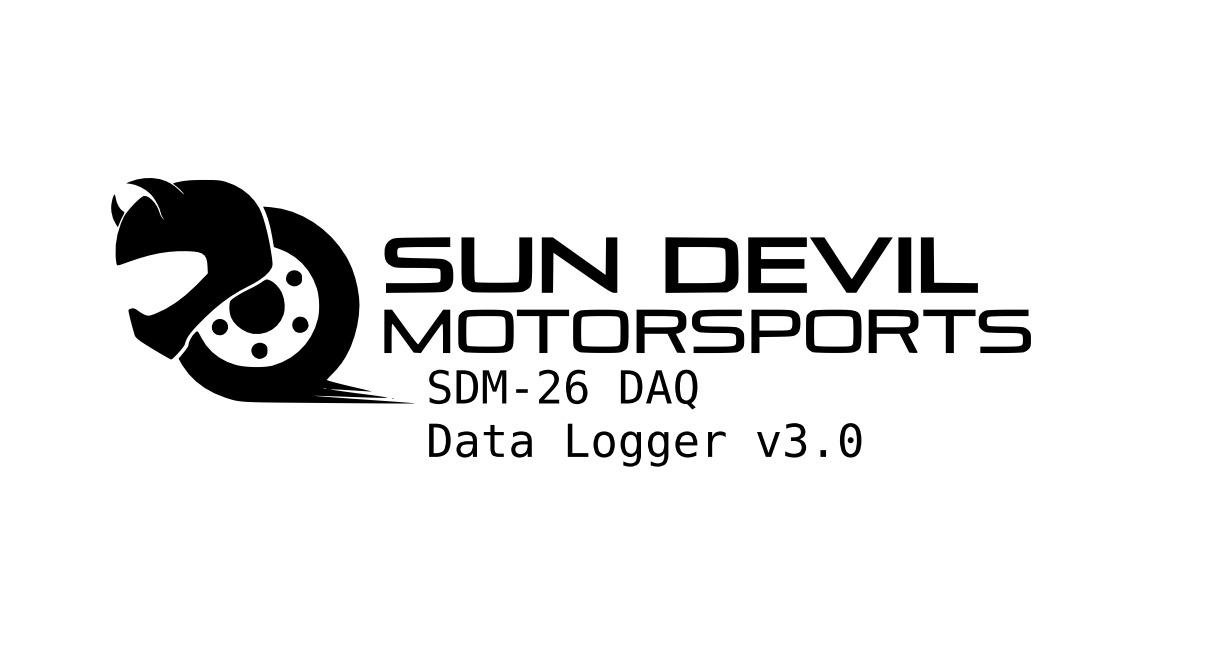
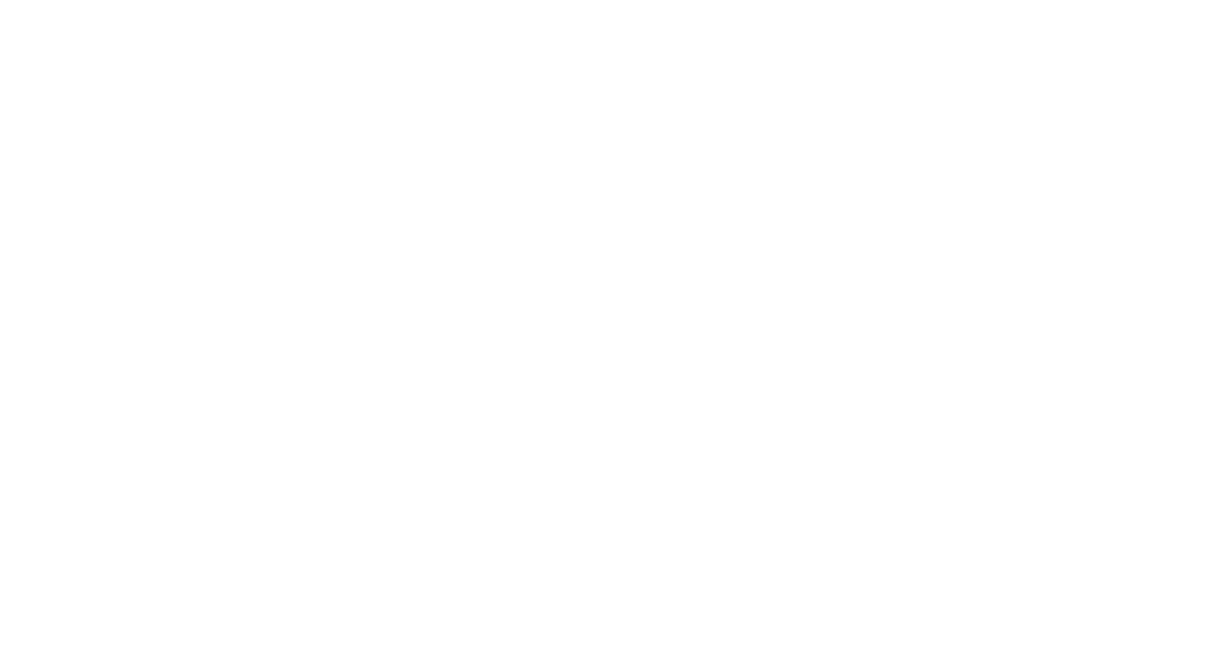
drawing: [111, 178, 1031, 404] -> none
text: SDM-26 DAQ (563, 389) -> none
text: Data Logger v3.0 (645, 444) -> none

